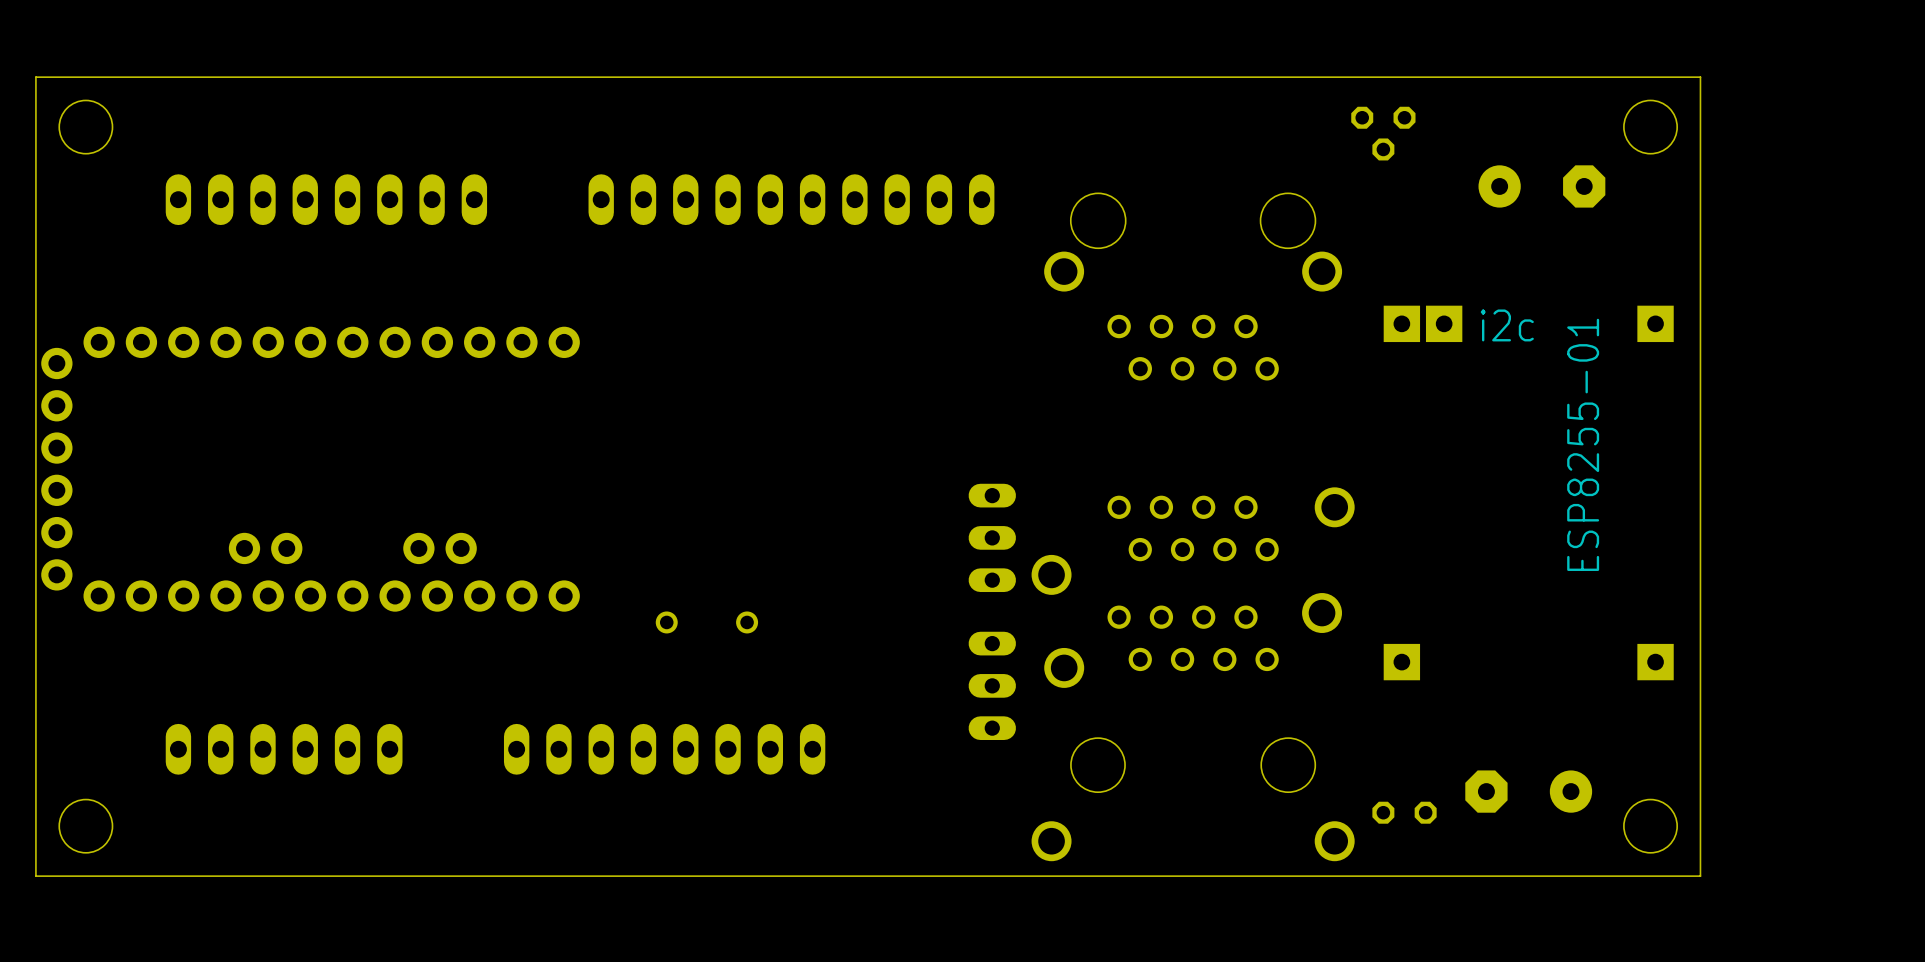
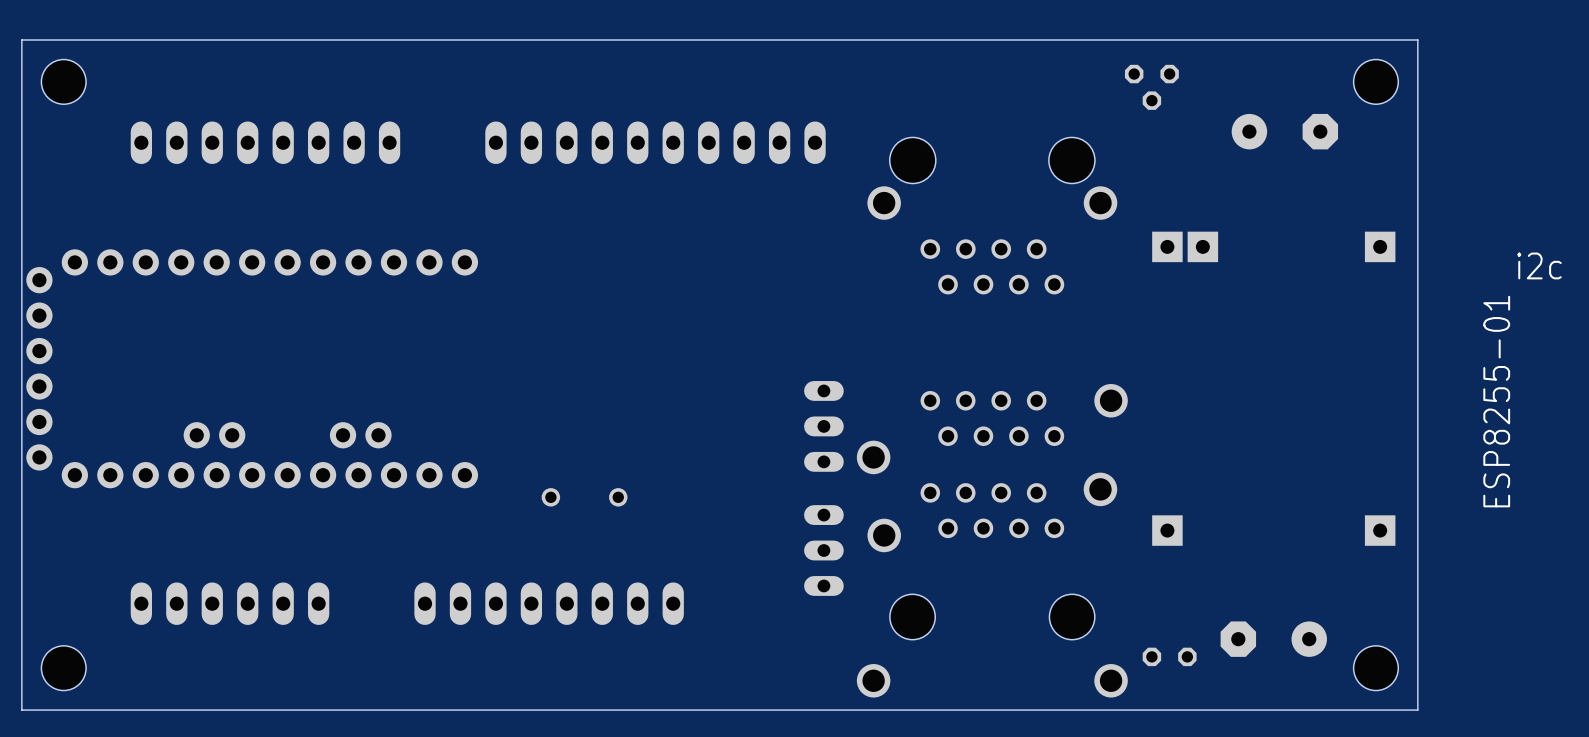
text position: i2c (1507, 325) -> i2c (1539, 265)
text position: ESP8255-01 (1583, 444) -> ESP8255-01 (1496, 401)

